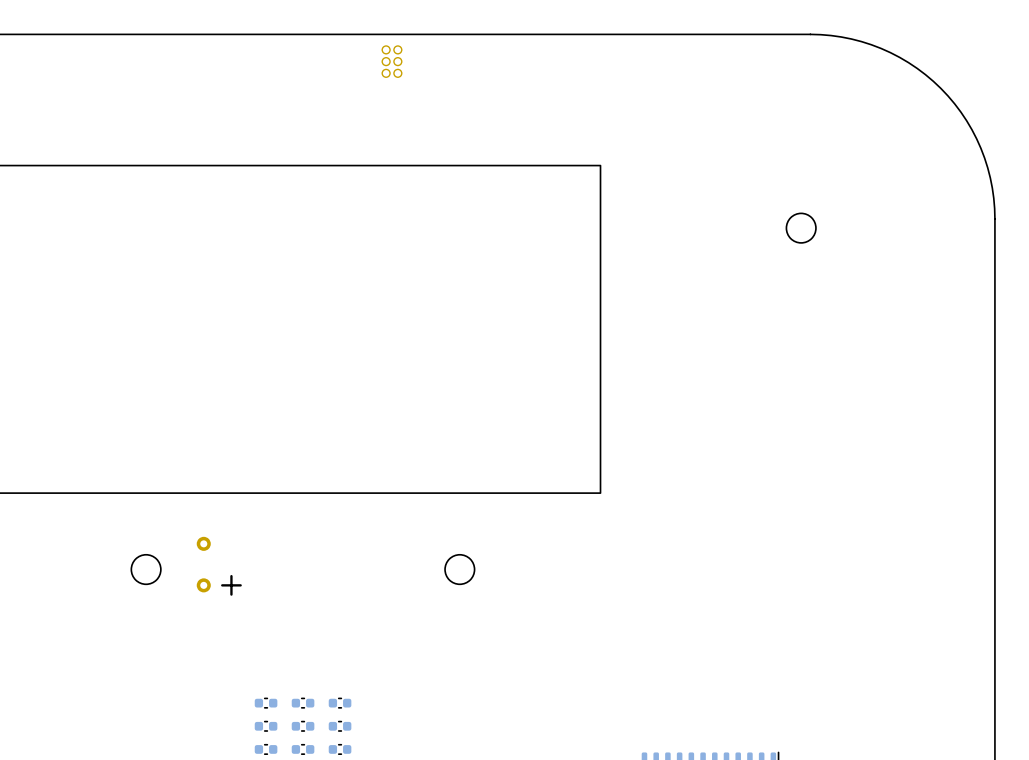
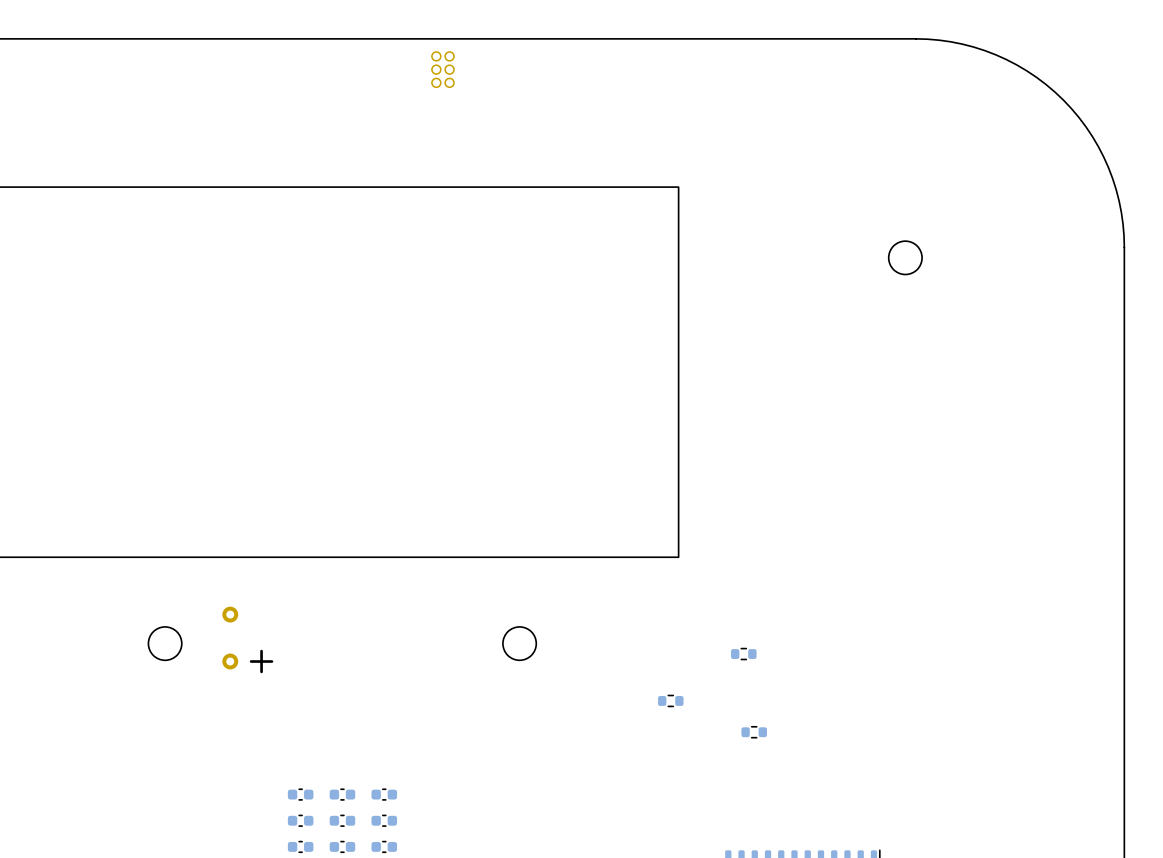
part: none -> (743, 654)
part: none -> (670, 700)
part: none -> (754, 732)

